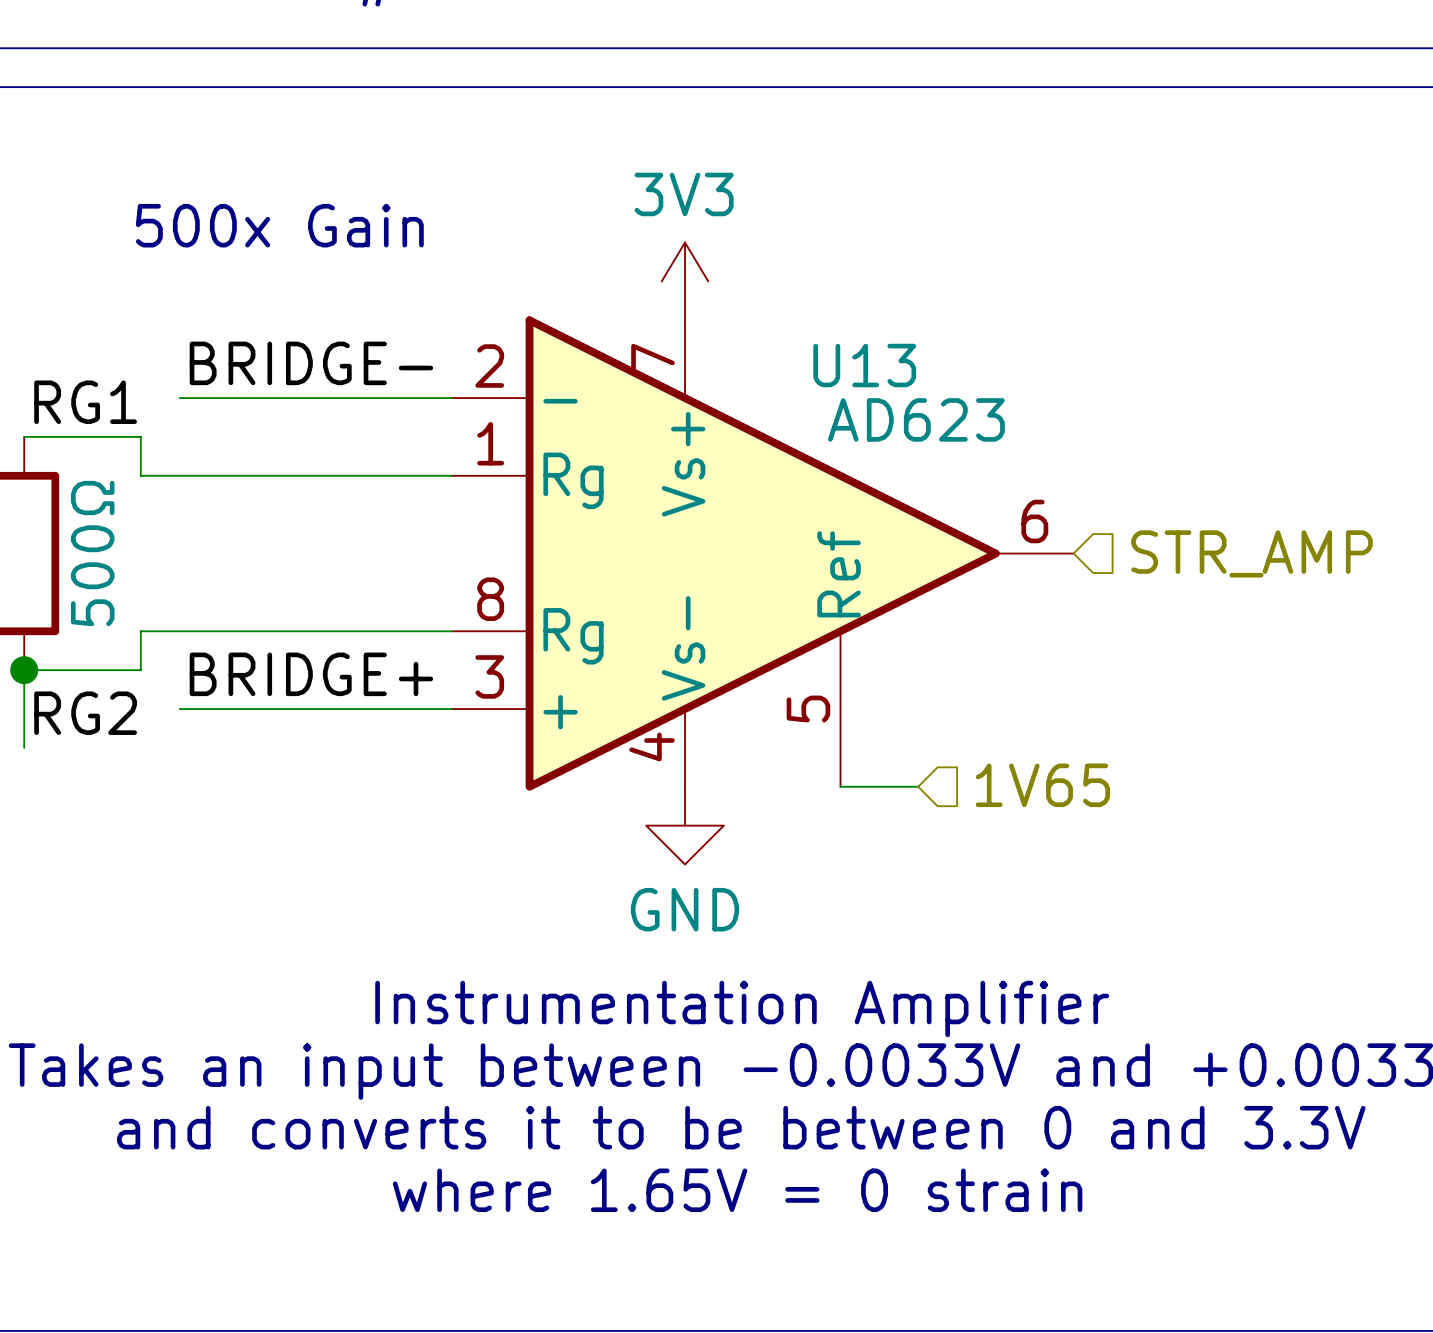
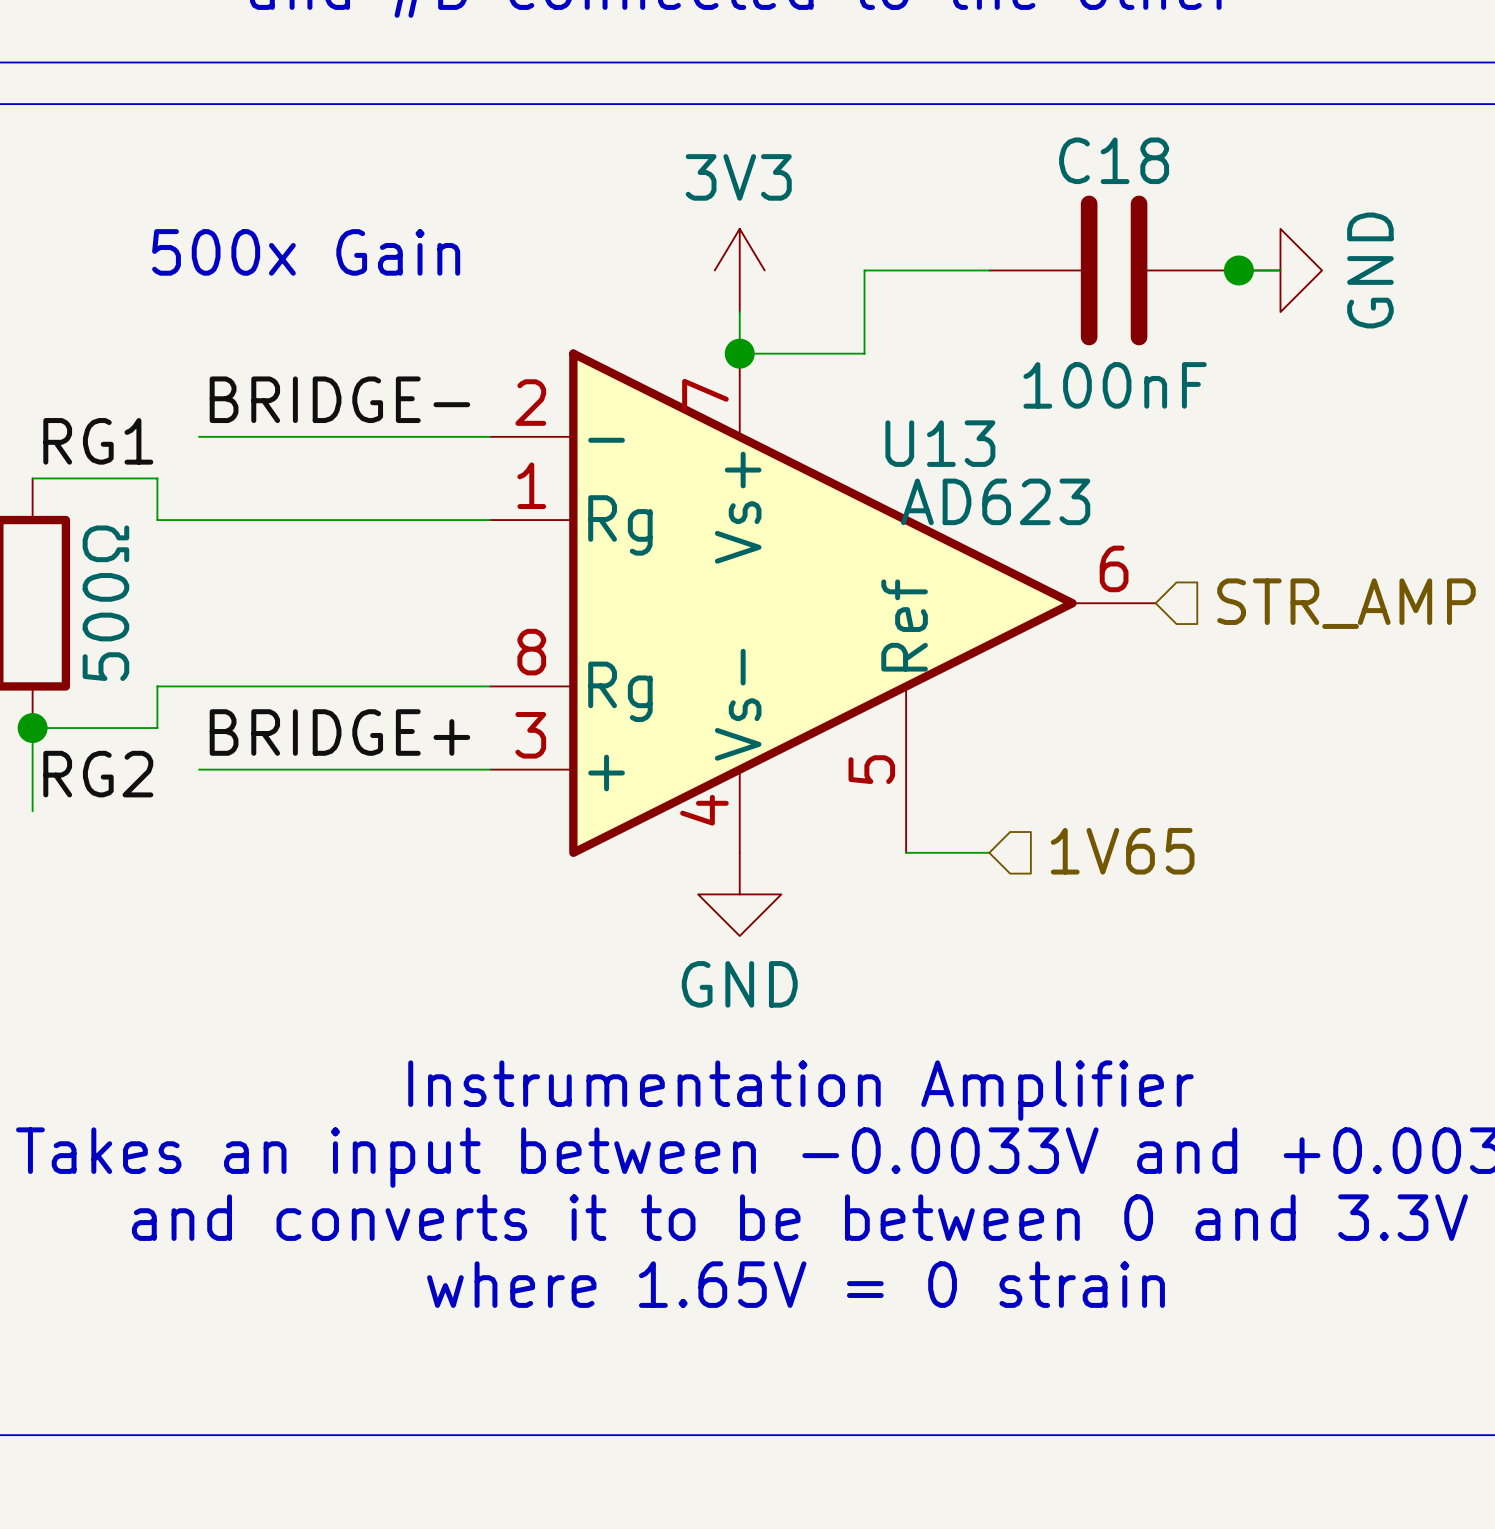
wire: none -> (989, 270) (864, 270) (864, 353) (739, 353) (739, 312)
C18: none -> 100nF (1114, 270)
wire: none -> (1238, 270) (1280, 270)
junction: none -> (1238, 270)
power symbol: none -> GND (1280, 270)
power symbol position: 3V3 (685, 281) -> 3V3 (739, 270)
junction: none -> (739, 353)
U13 name position: U13 (864, 365) -> U13 (940, 443)
U13 value position: AD623 (916, 419) -> AD623 (995, 501)

